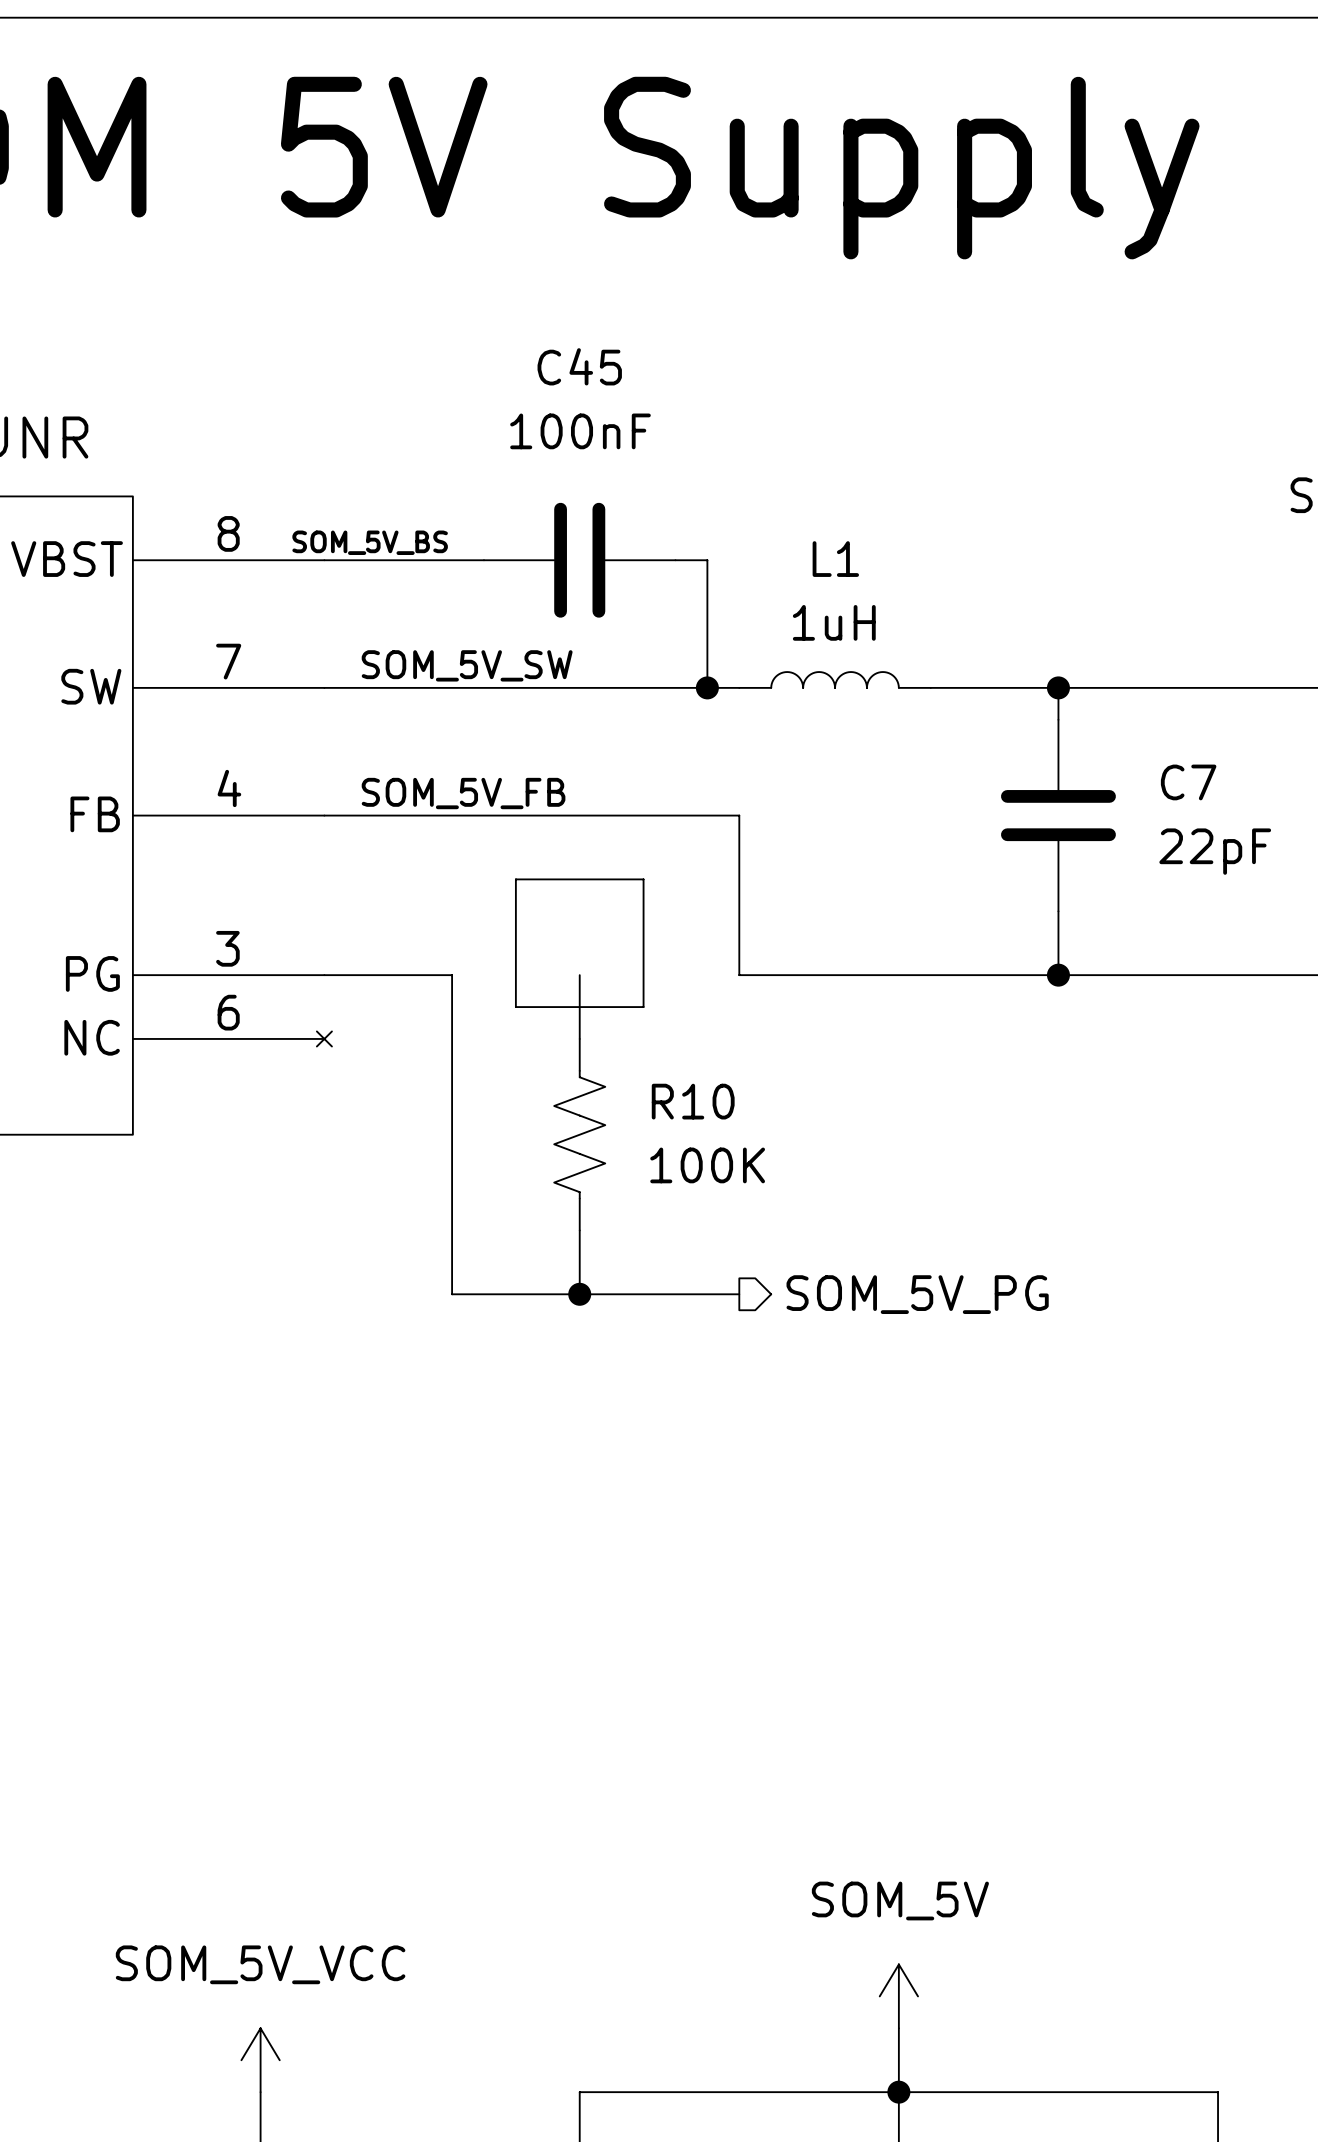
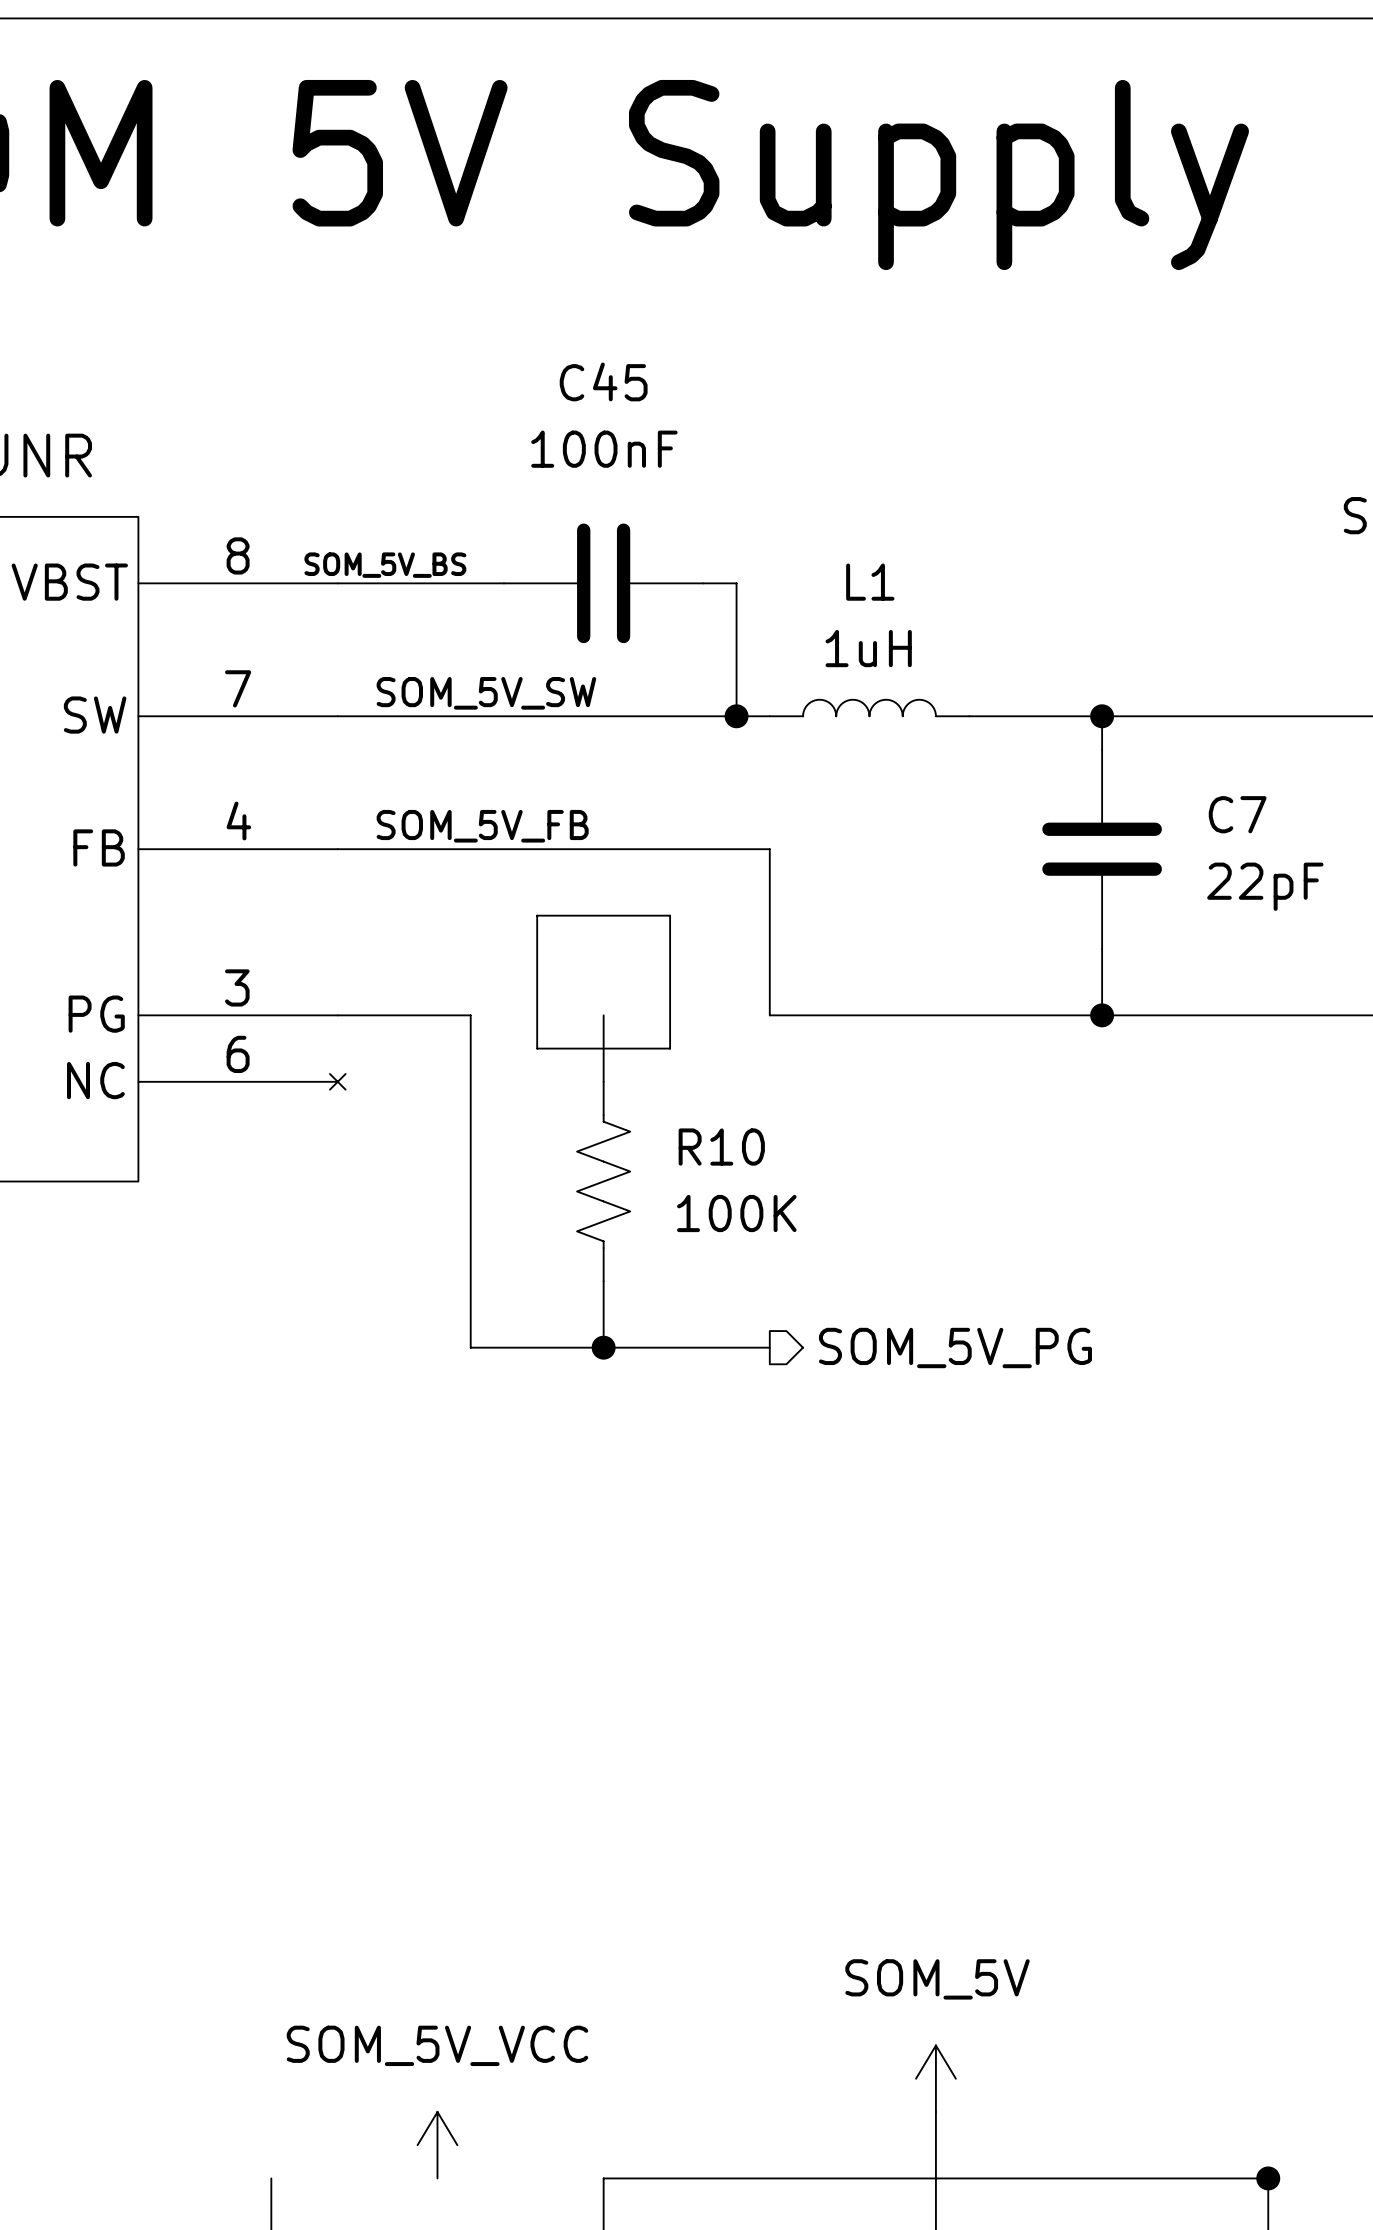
power symbol position: SOM_5V_VCC (260, 2060) -> SOM_5V_VCC (437, 2145)
junction: (898, 2092) -> none
junction: none -> (1268, 2178)

